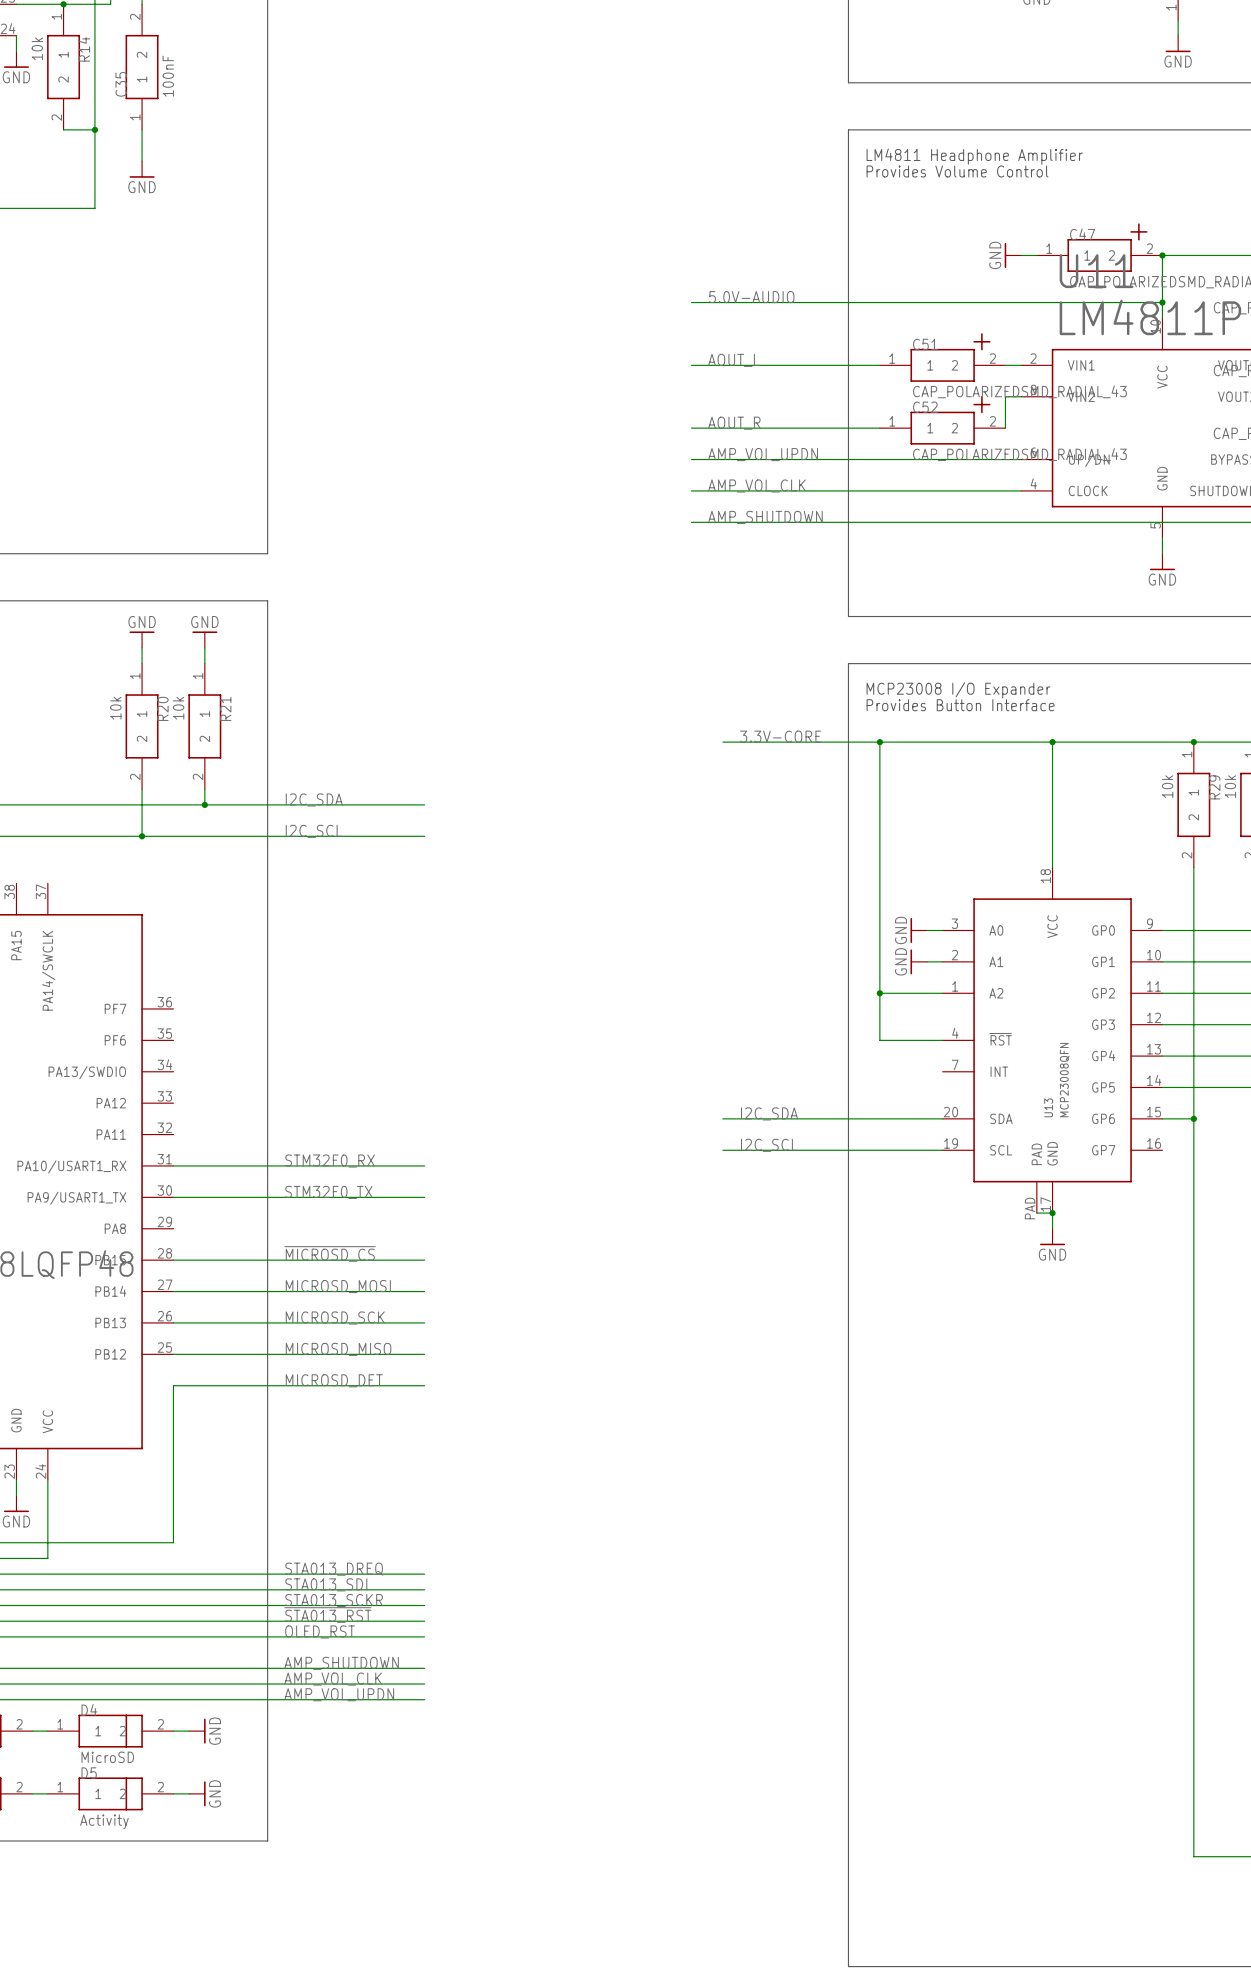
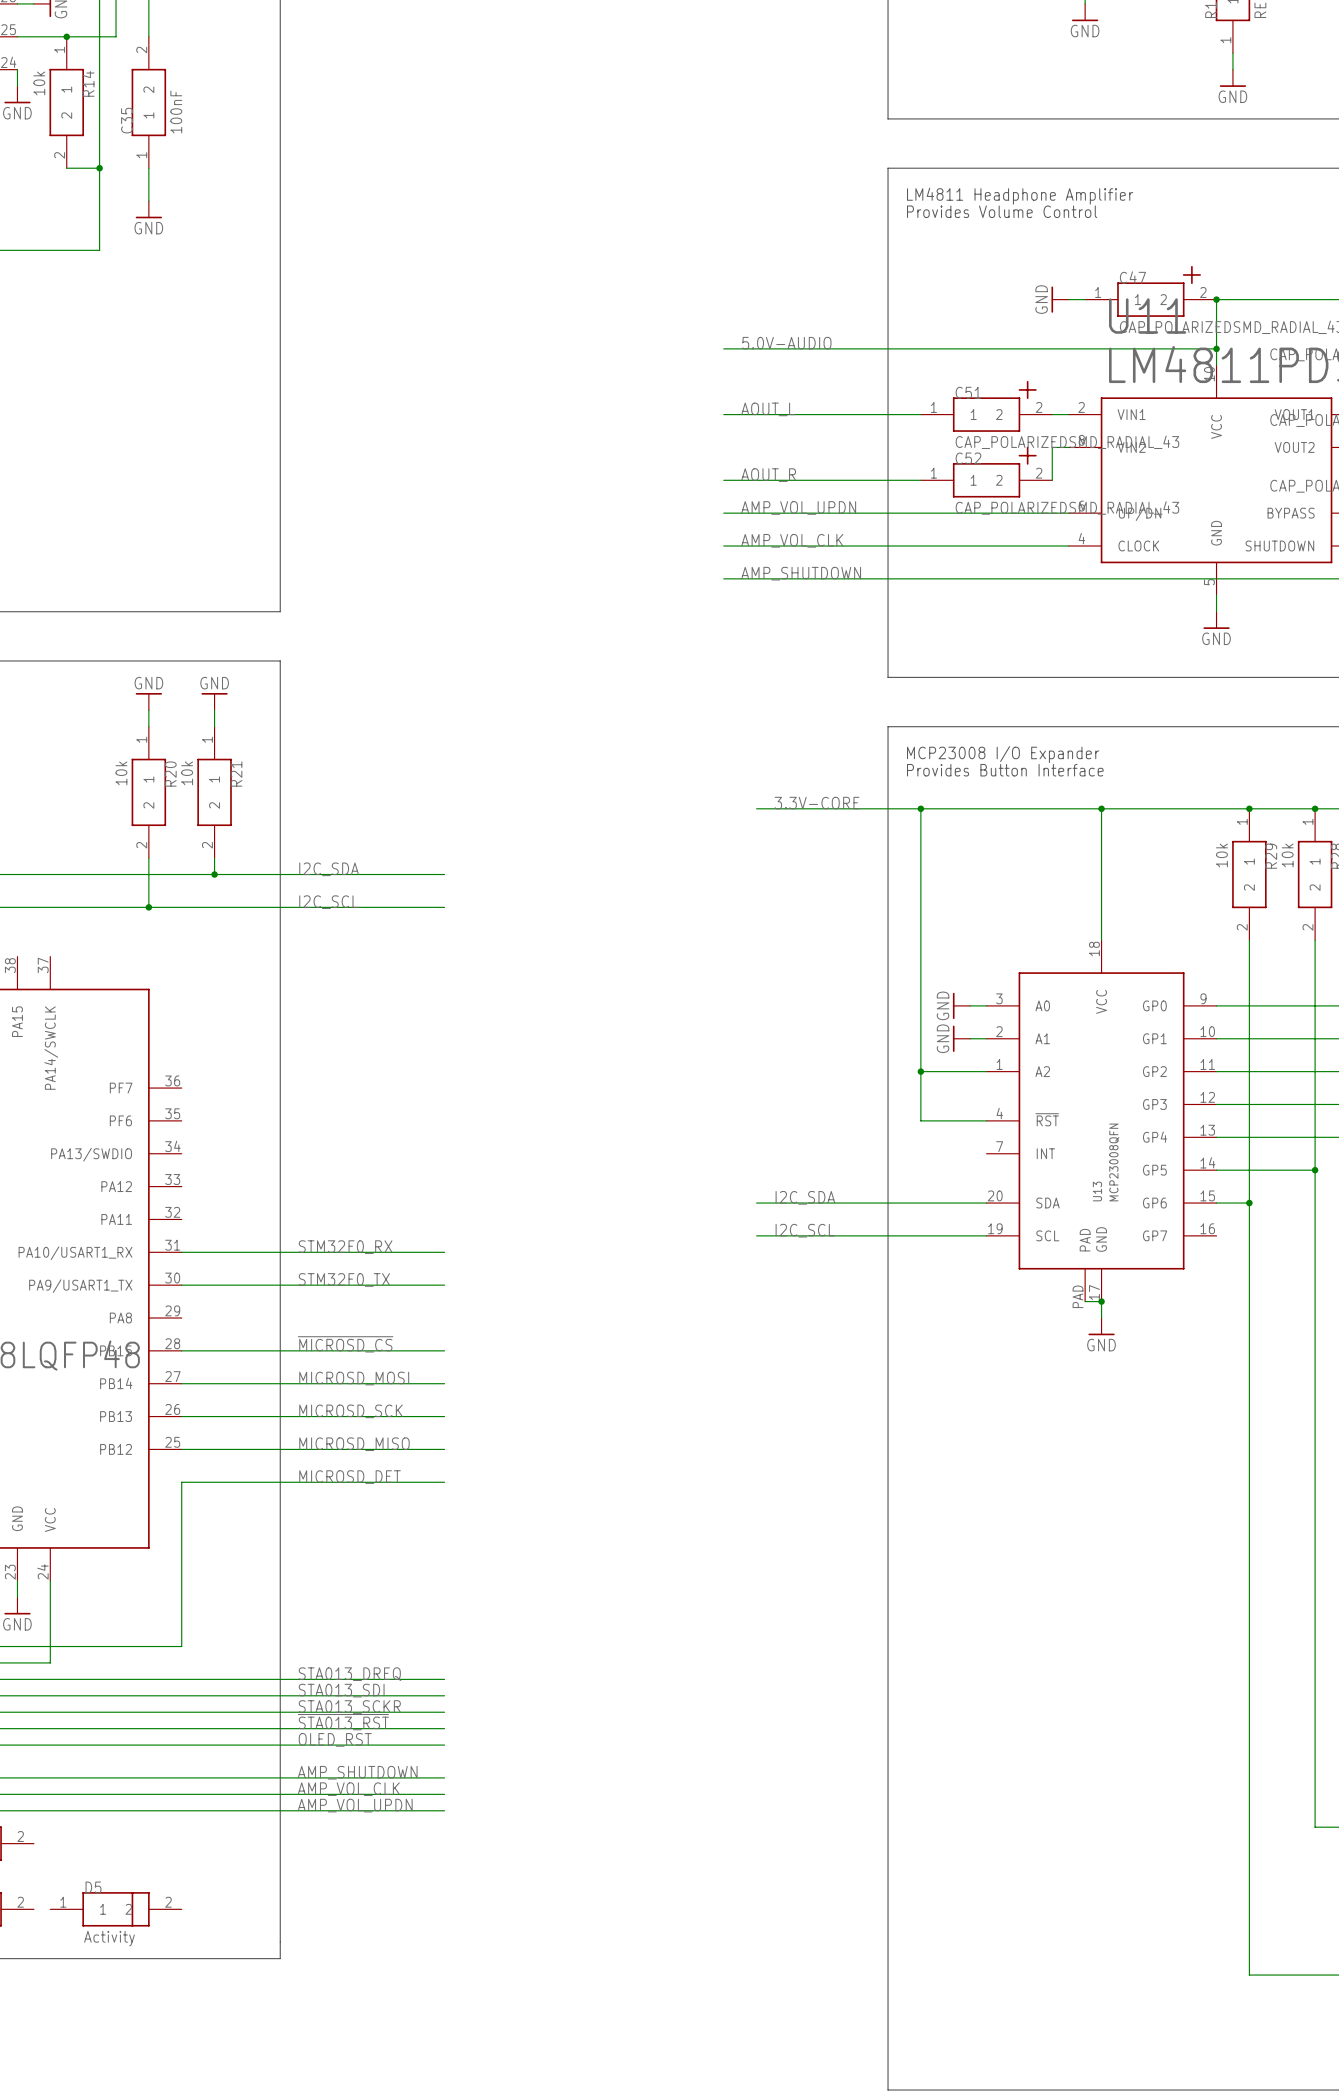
wire: (32, 1731) (47, 1731) -> none
D4: MicroSD (110, 1731) -> none
wire: (173, 1731) (189, 1731) -> none
power symbol: GND (197, 1731) -> none
wire: (32, 1793) (47, 1793) -> none
wire: (173, 1793) (189, 1793) -> none
power symbol: GND (197, 1793) -> none

